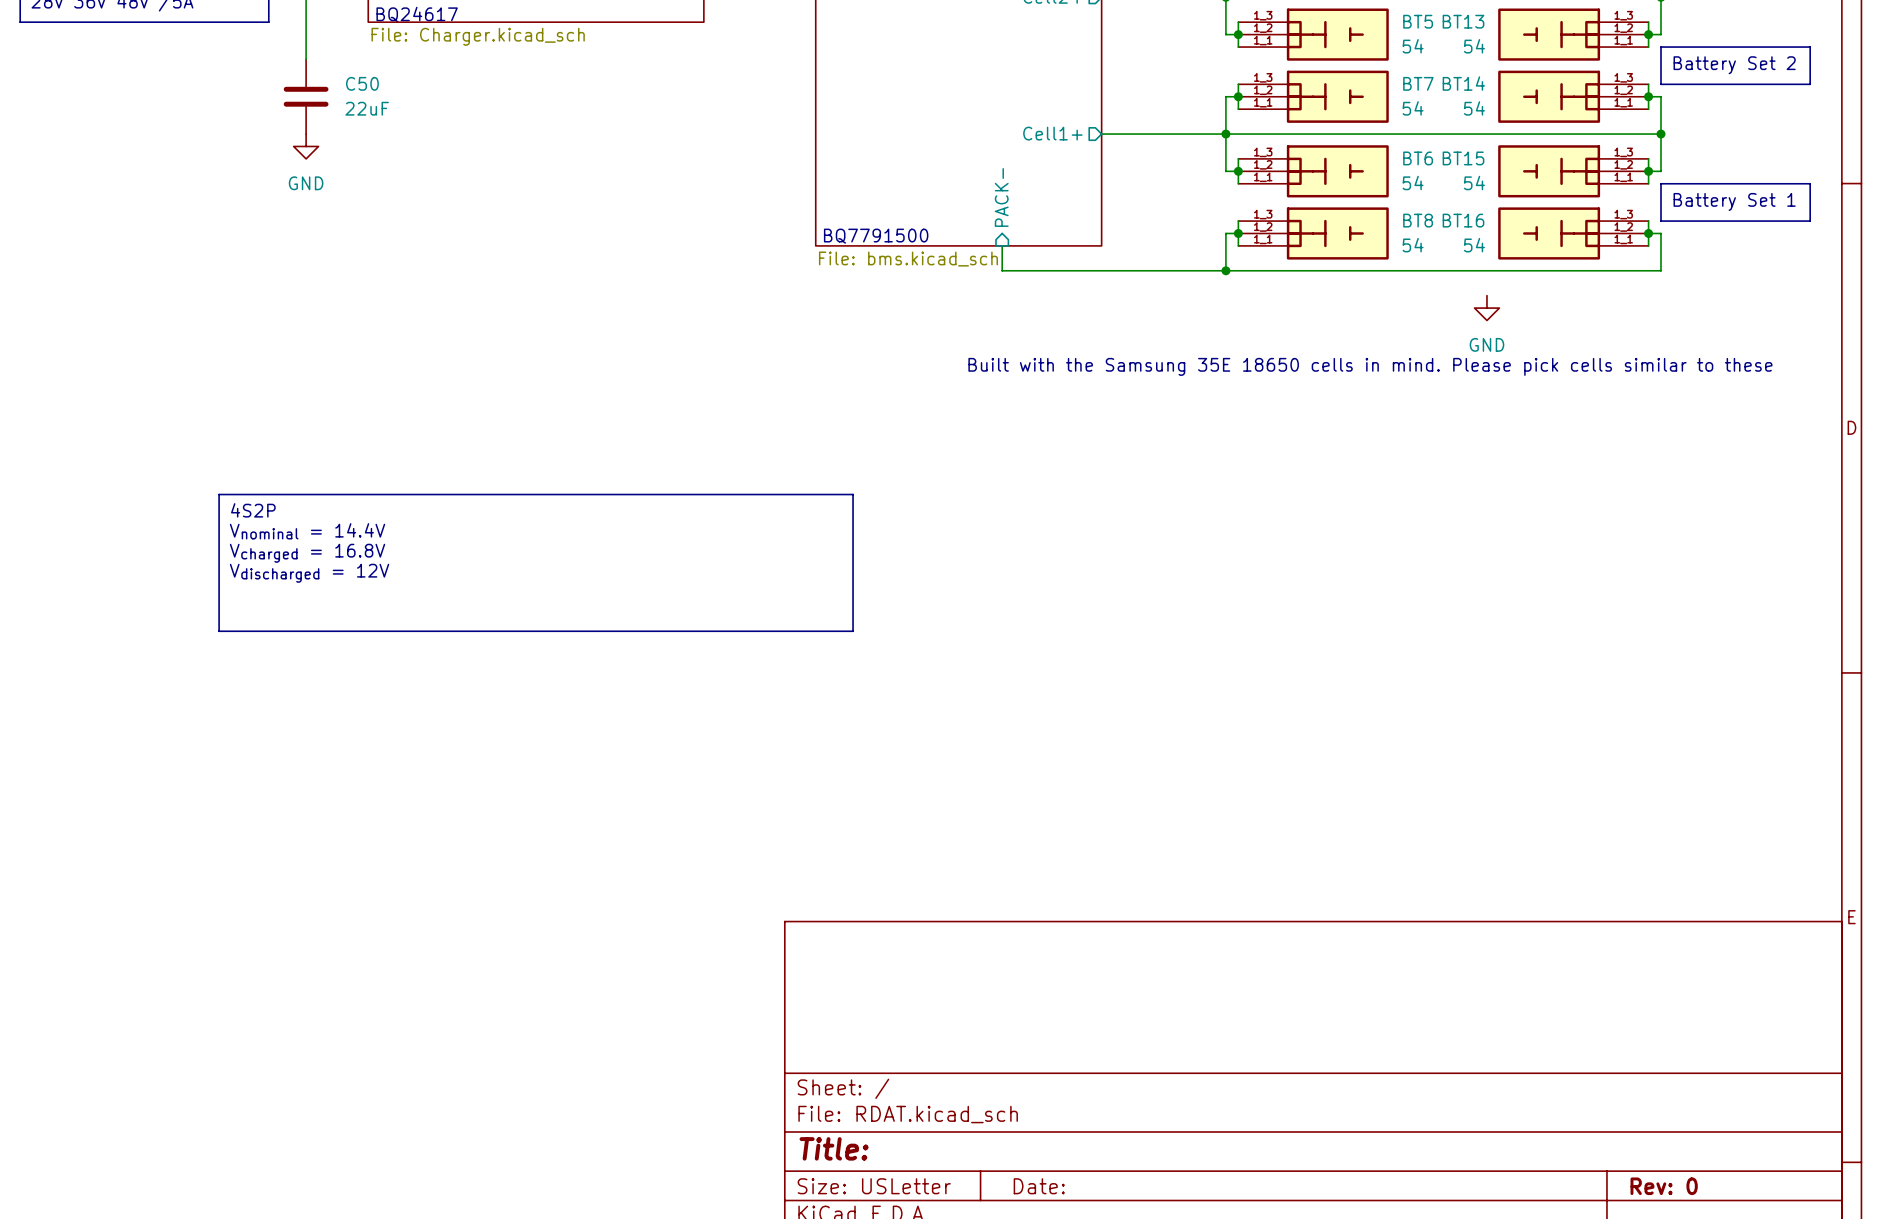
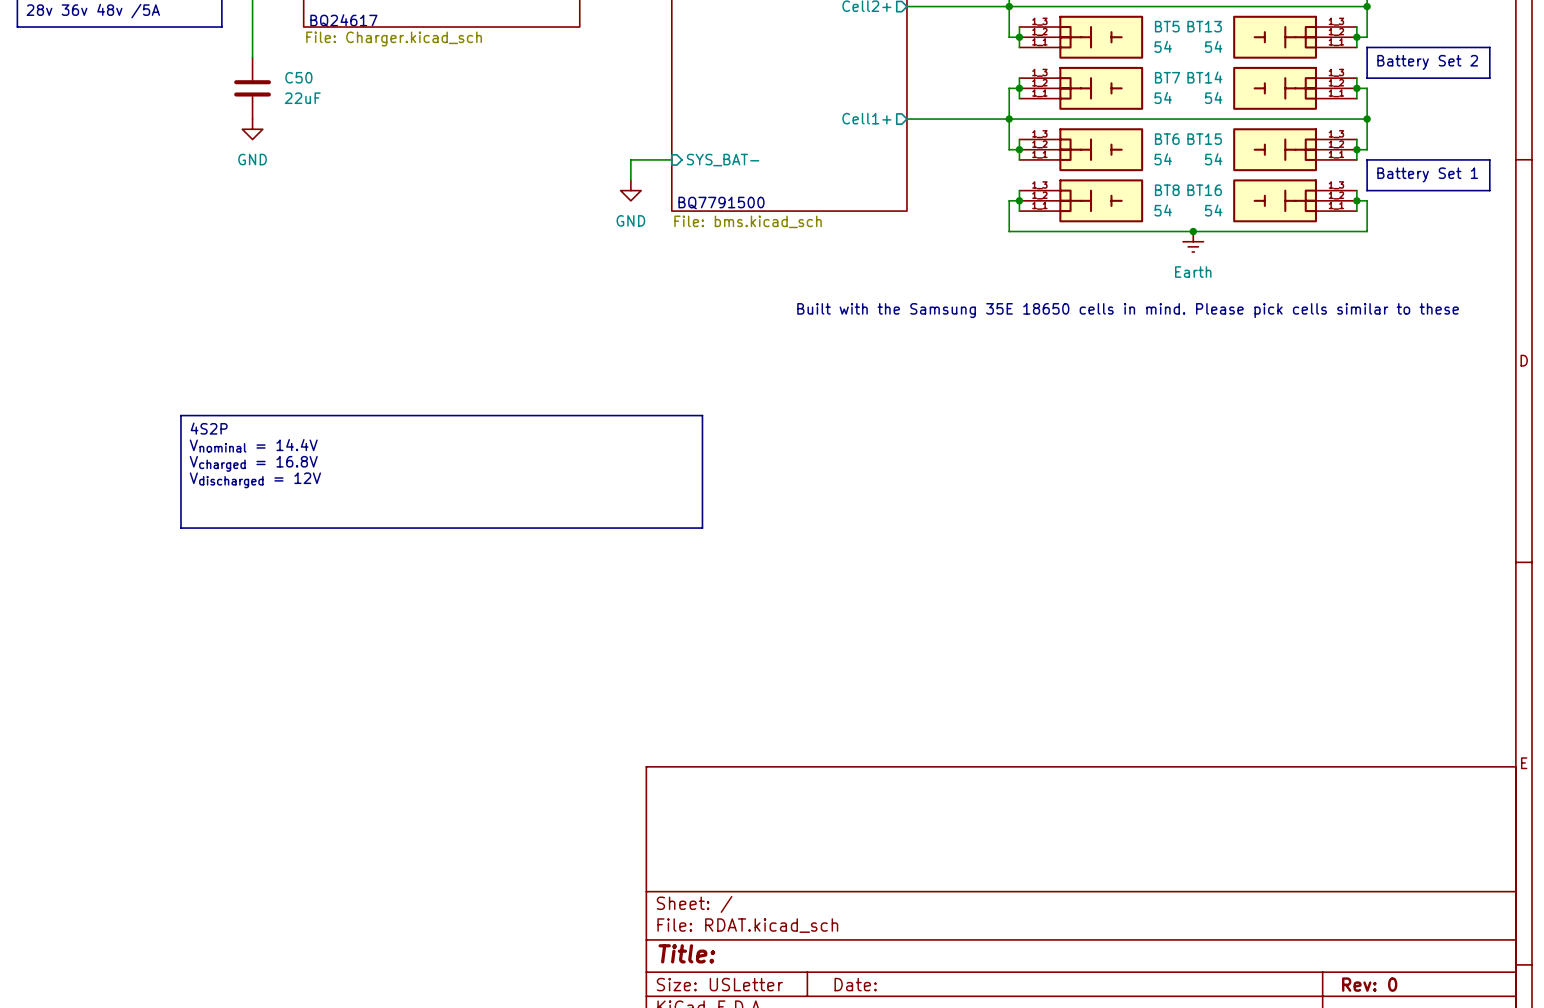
wire: none -> (671, 159) (630, 159) (630, 180)
sheet pin: none -> SYS_BAT- (723, 160)
sheet pin: PACK- (1001, 197) -> none
power symbol: none -> GND (630, 190)
wire: (1002, 245) (1002, 270) (1225, 270) -> none
junction: (1225, 270) -> none
junction: none -> (1193, 231)
power symbol: none -> Earth (1193, 241)
power symbol: GND (1486, 308) -> none

